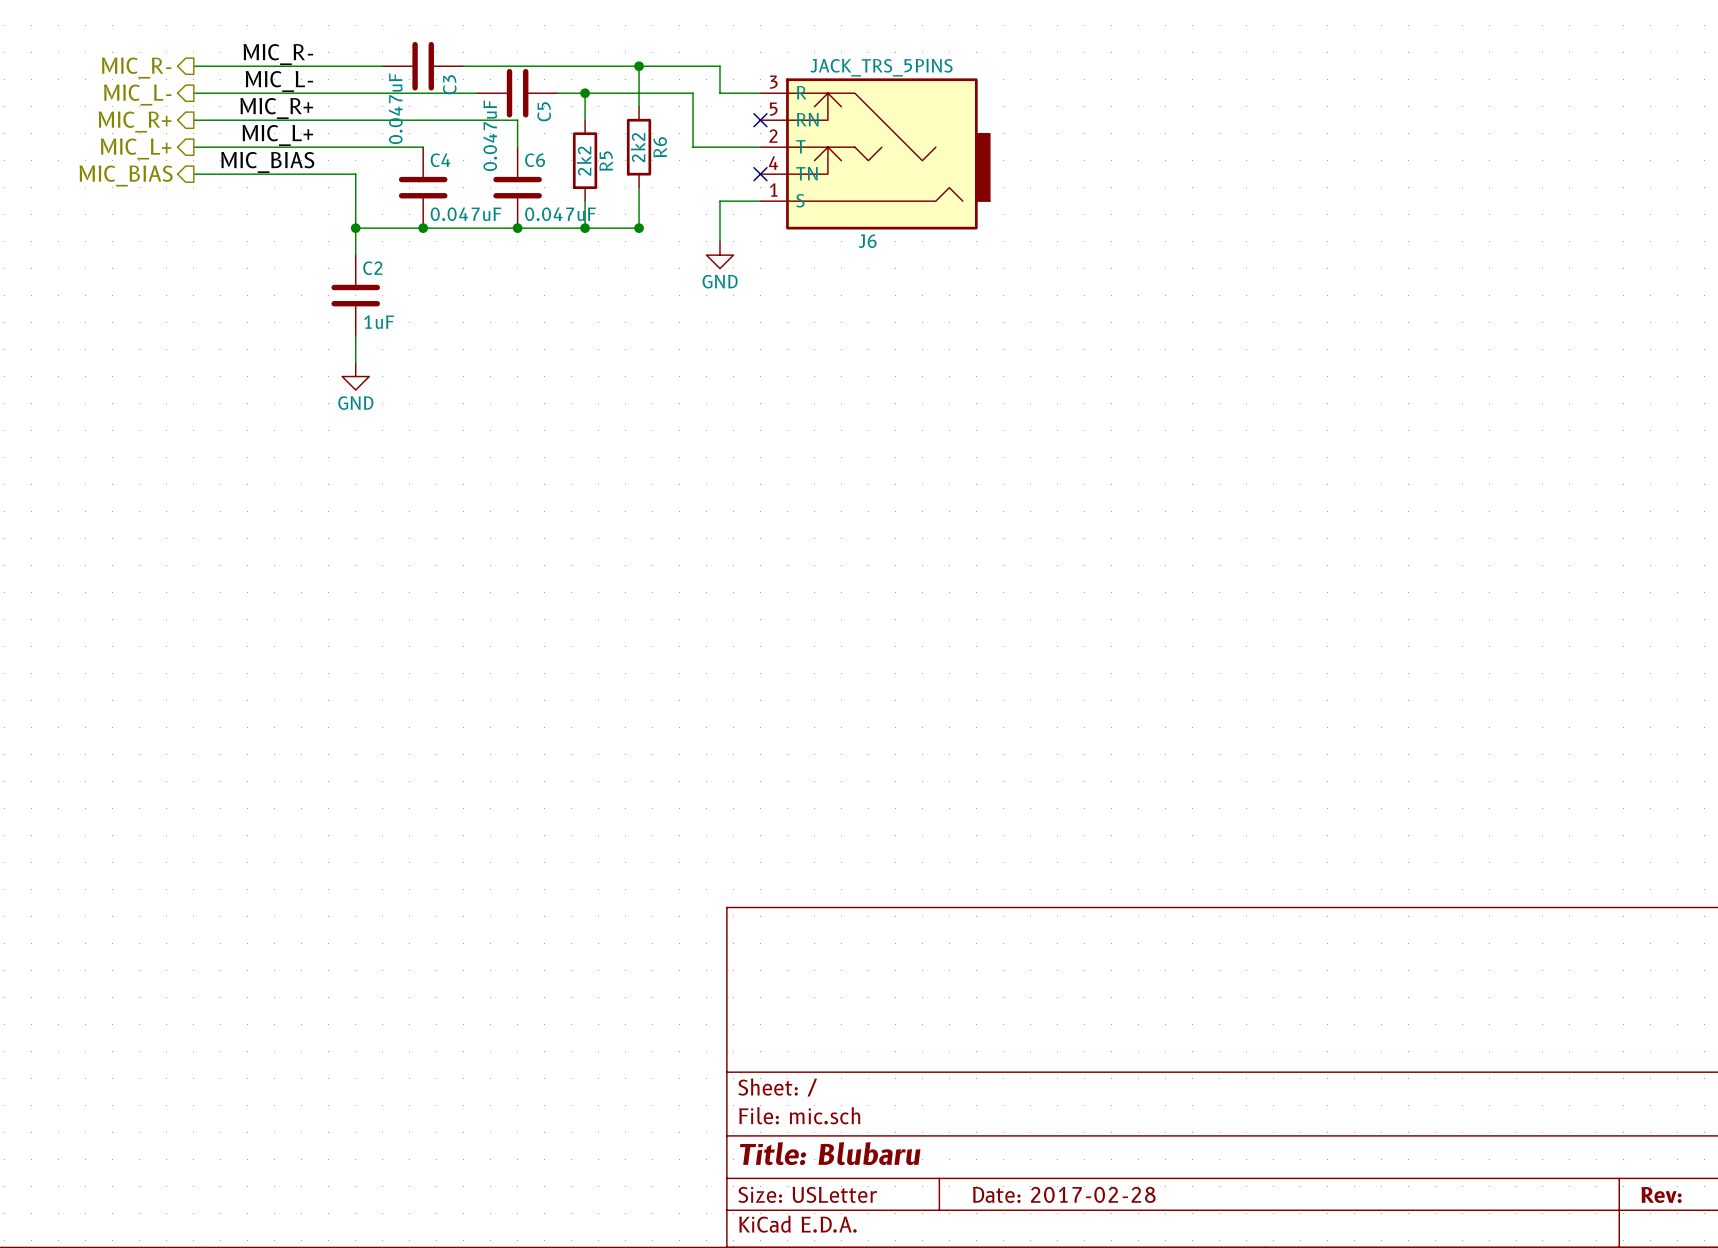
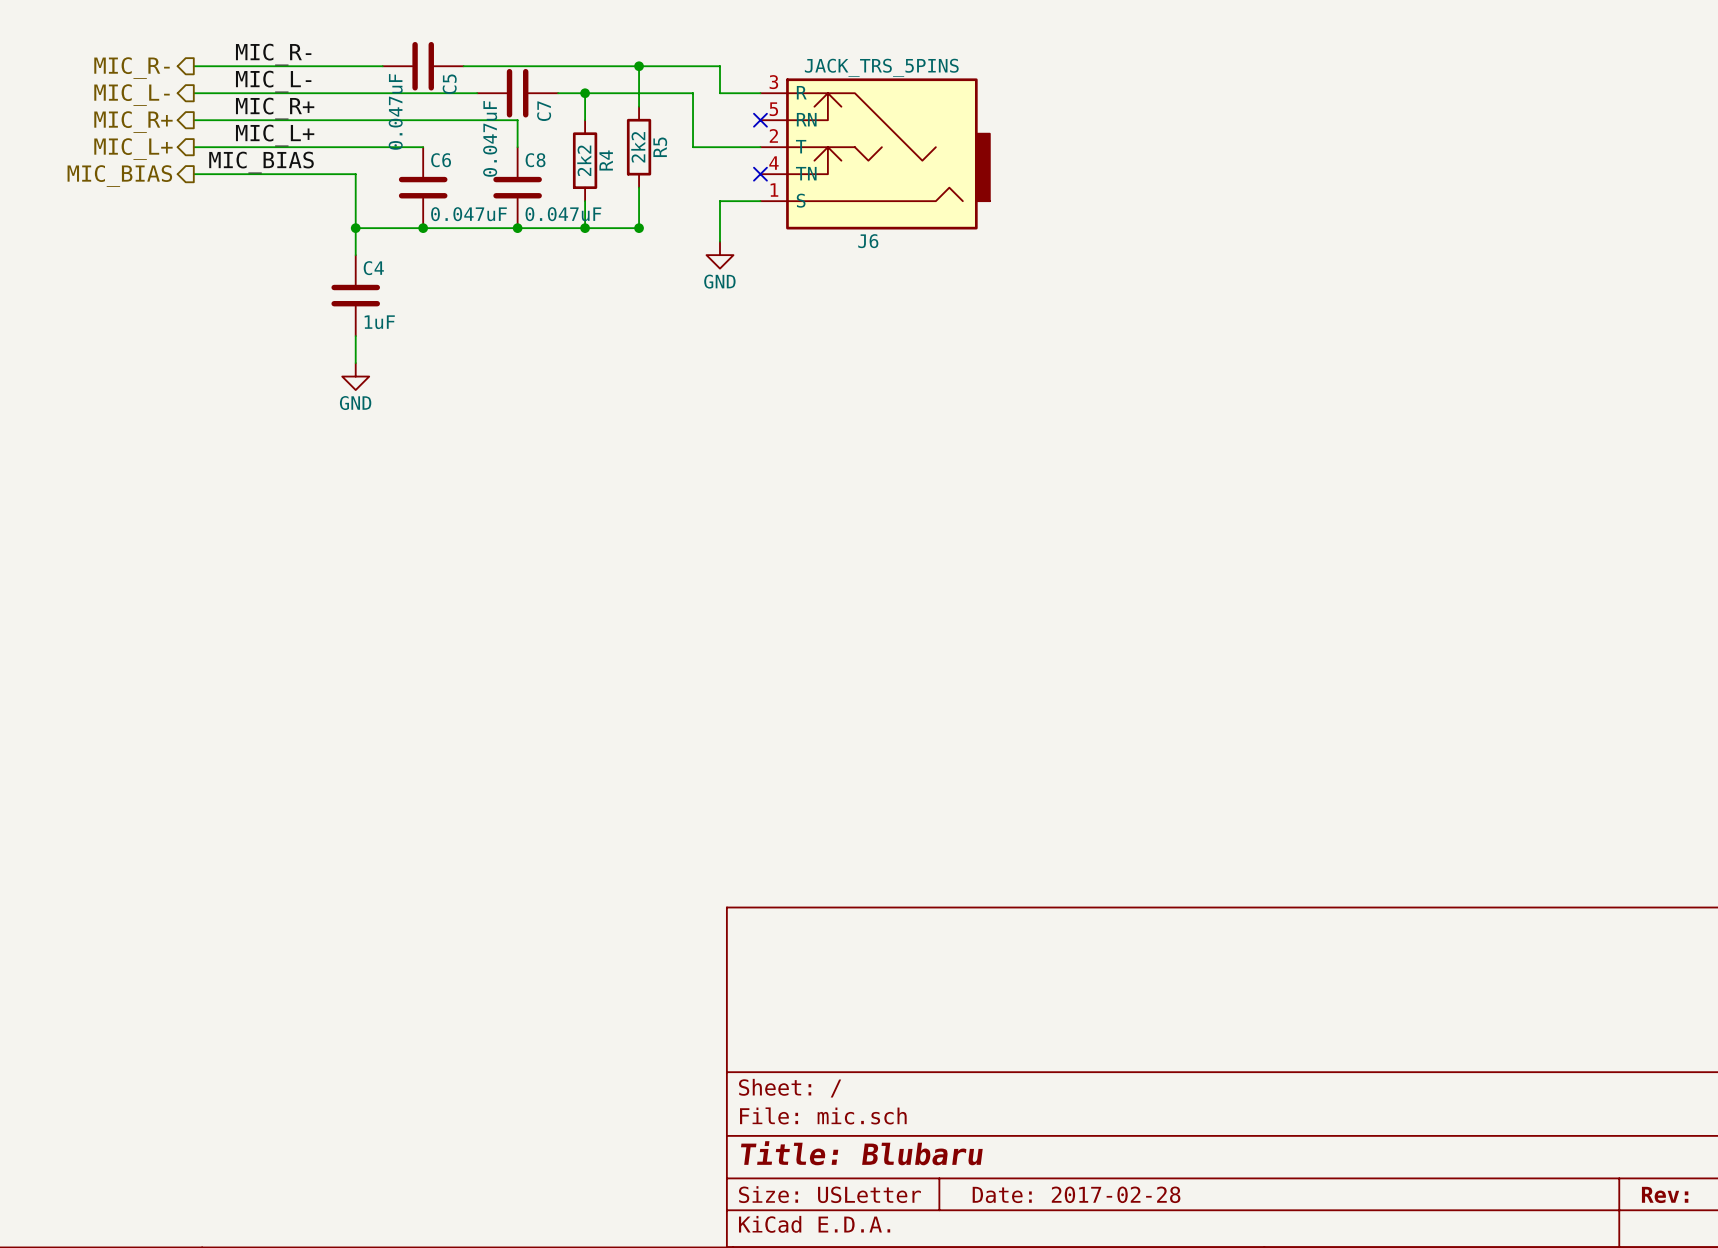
C3 name: C3 (449, 84) -> C5 (449, 84)
C5 name: C5 (544, 111) -> C7 (544, 111)
R6 name: R6 (660, 147) -> R5 (660, 147)
C4 name: C4 (440, 160) -> C6 (441, 160)
C6 name: C6 (535, 160) -> C8 (535, 160)
R5 name: R5 (606, 161) -> R4 (606, 160)
C2 name: C2 (372, 268) -> C4 (373, 268)

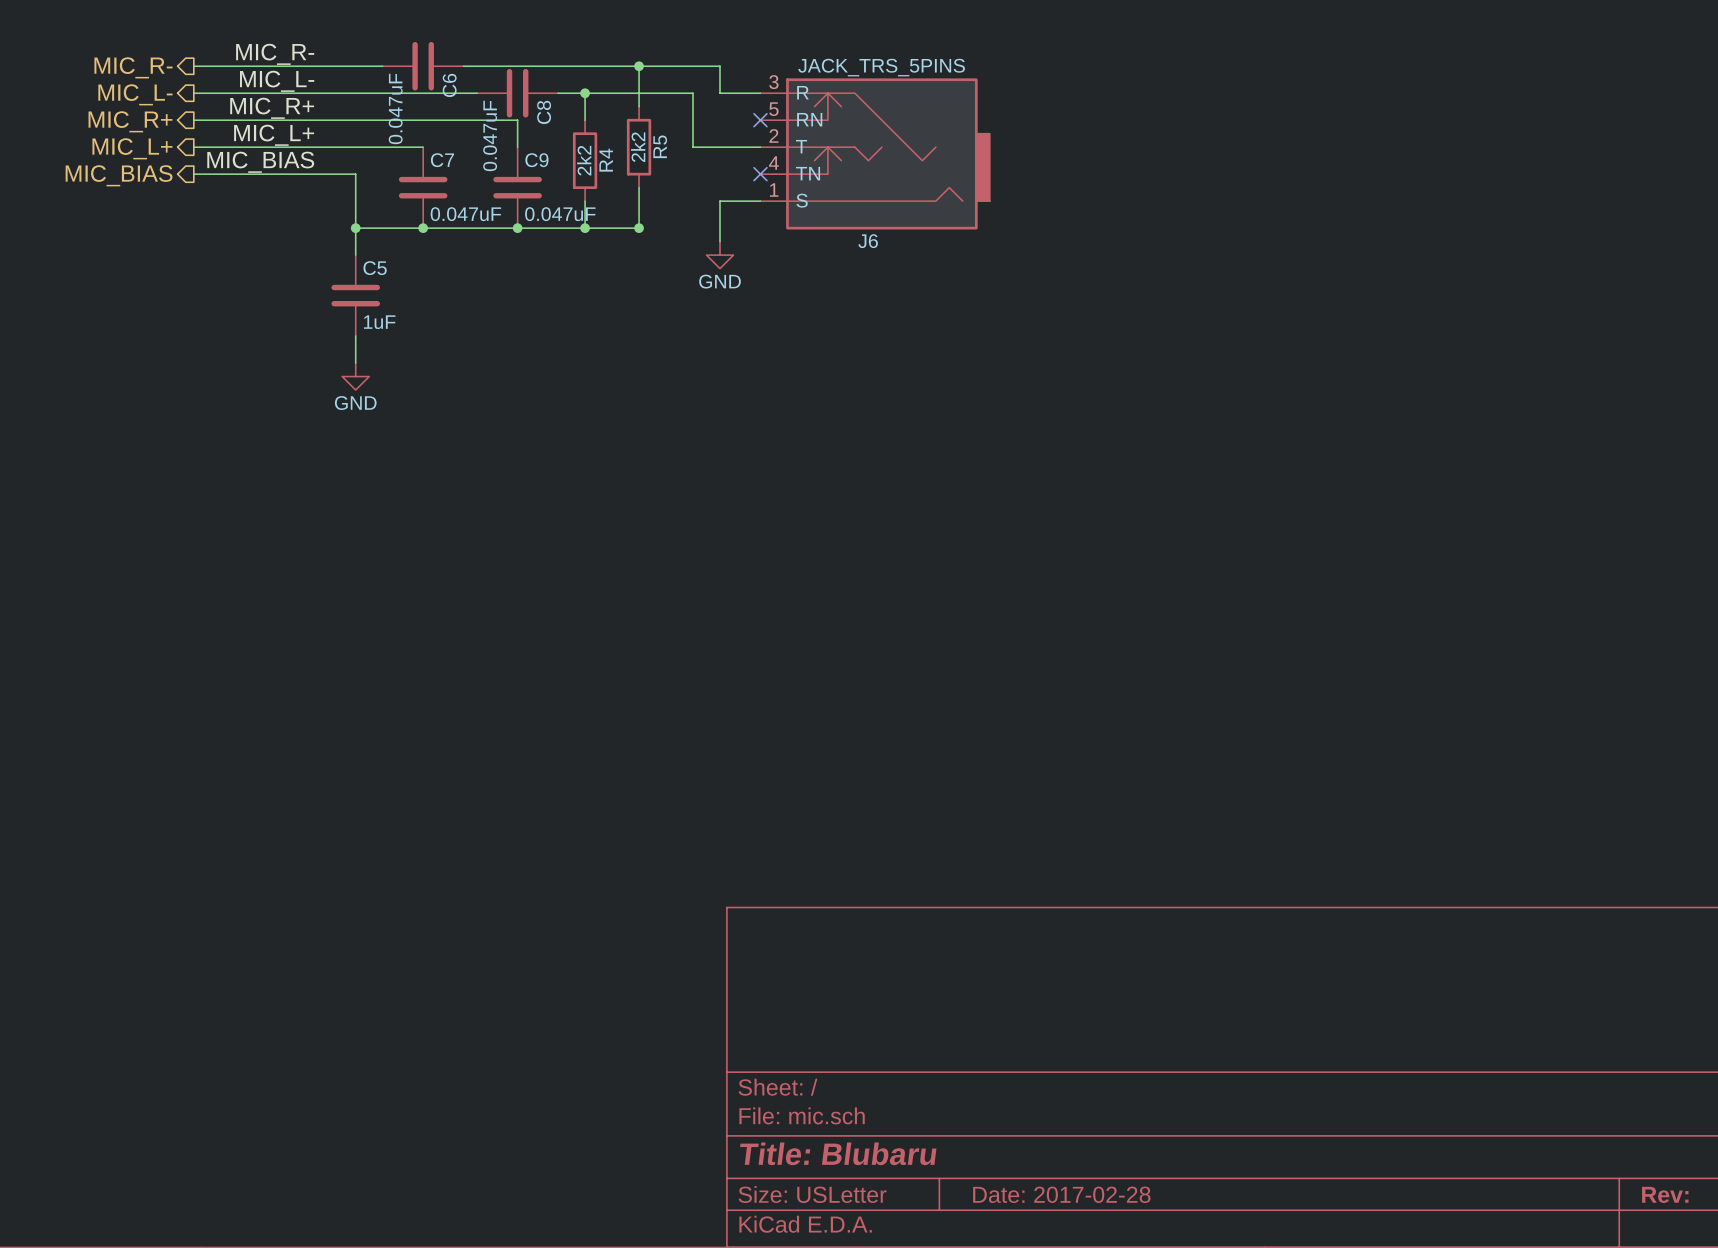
C5 name: C5 (449, 84) -> C6 (449, 85)
C7 name: C7 (544, 111) -> C8 (544, 112)
C6 name: C6 (441, 160) -> C7 (442, 160)
C8 name: C8 (535, 160) -> C9 (536, 160)
C4 name: C4 (373, 268) -> C5 (375, 268)

